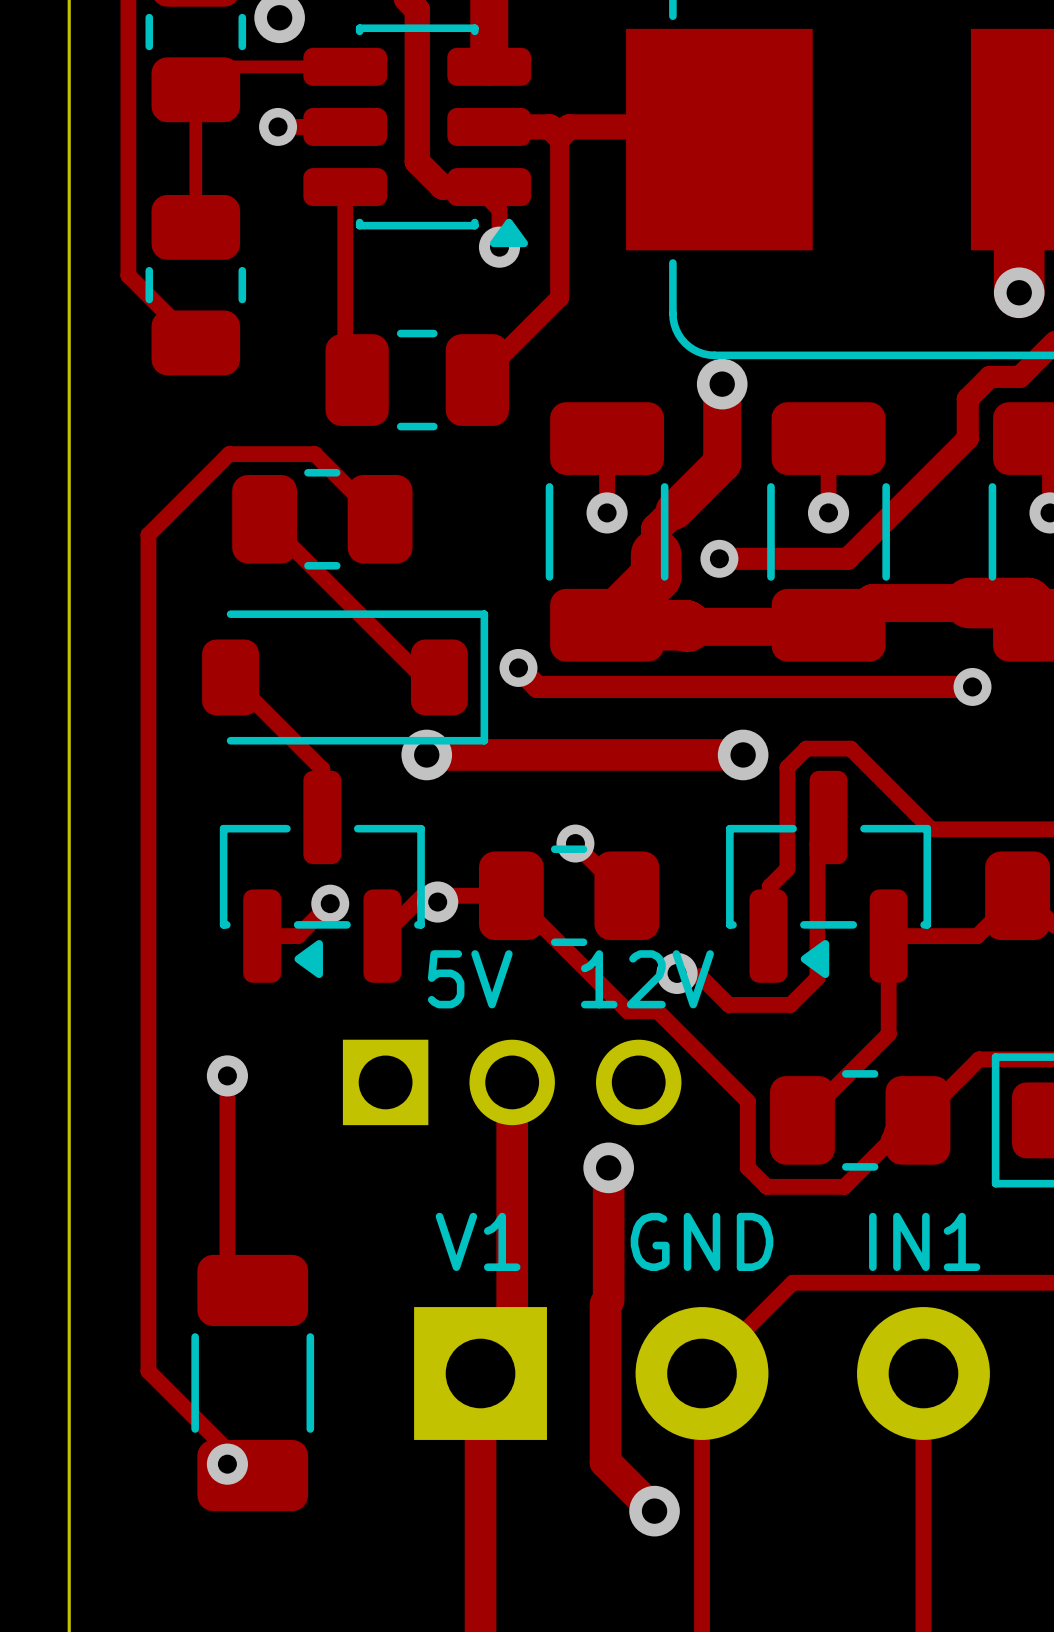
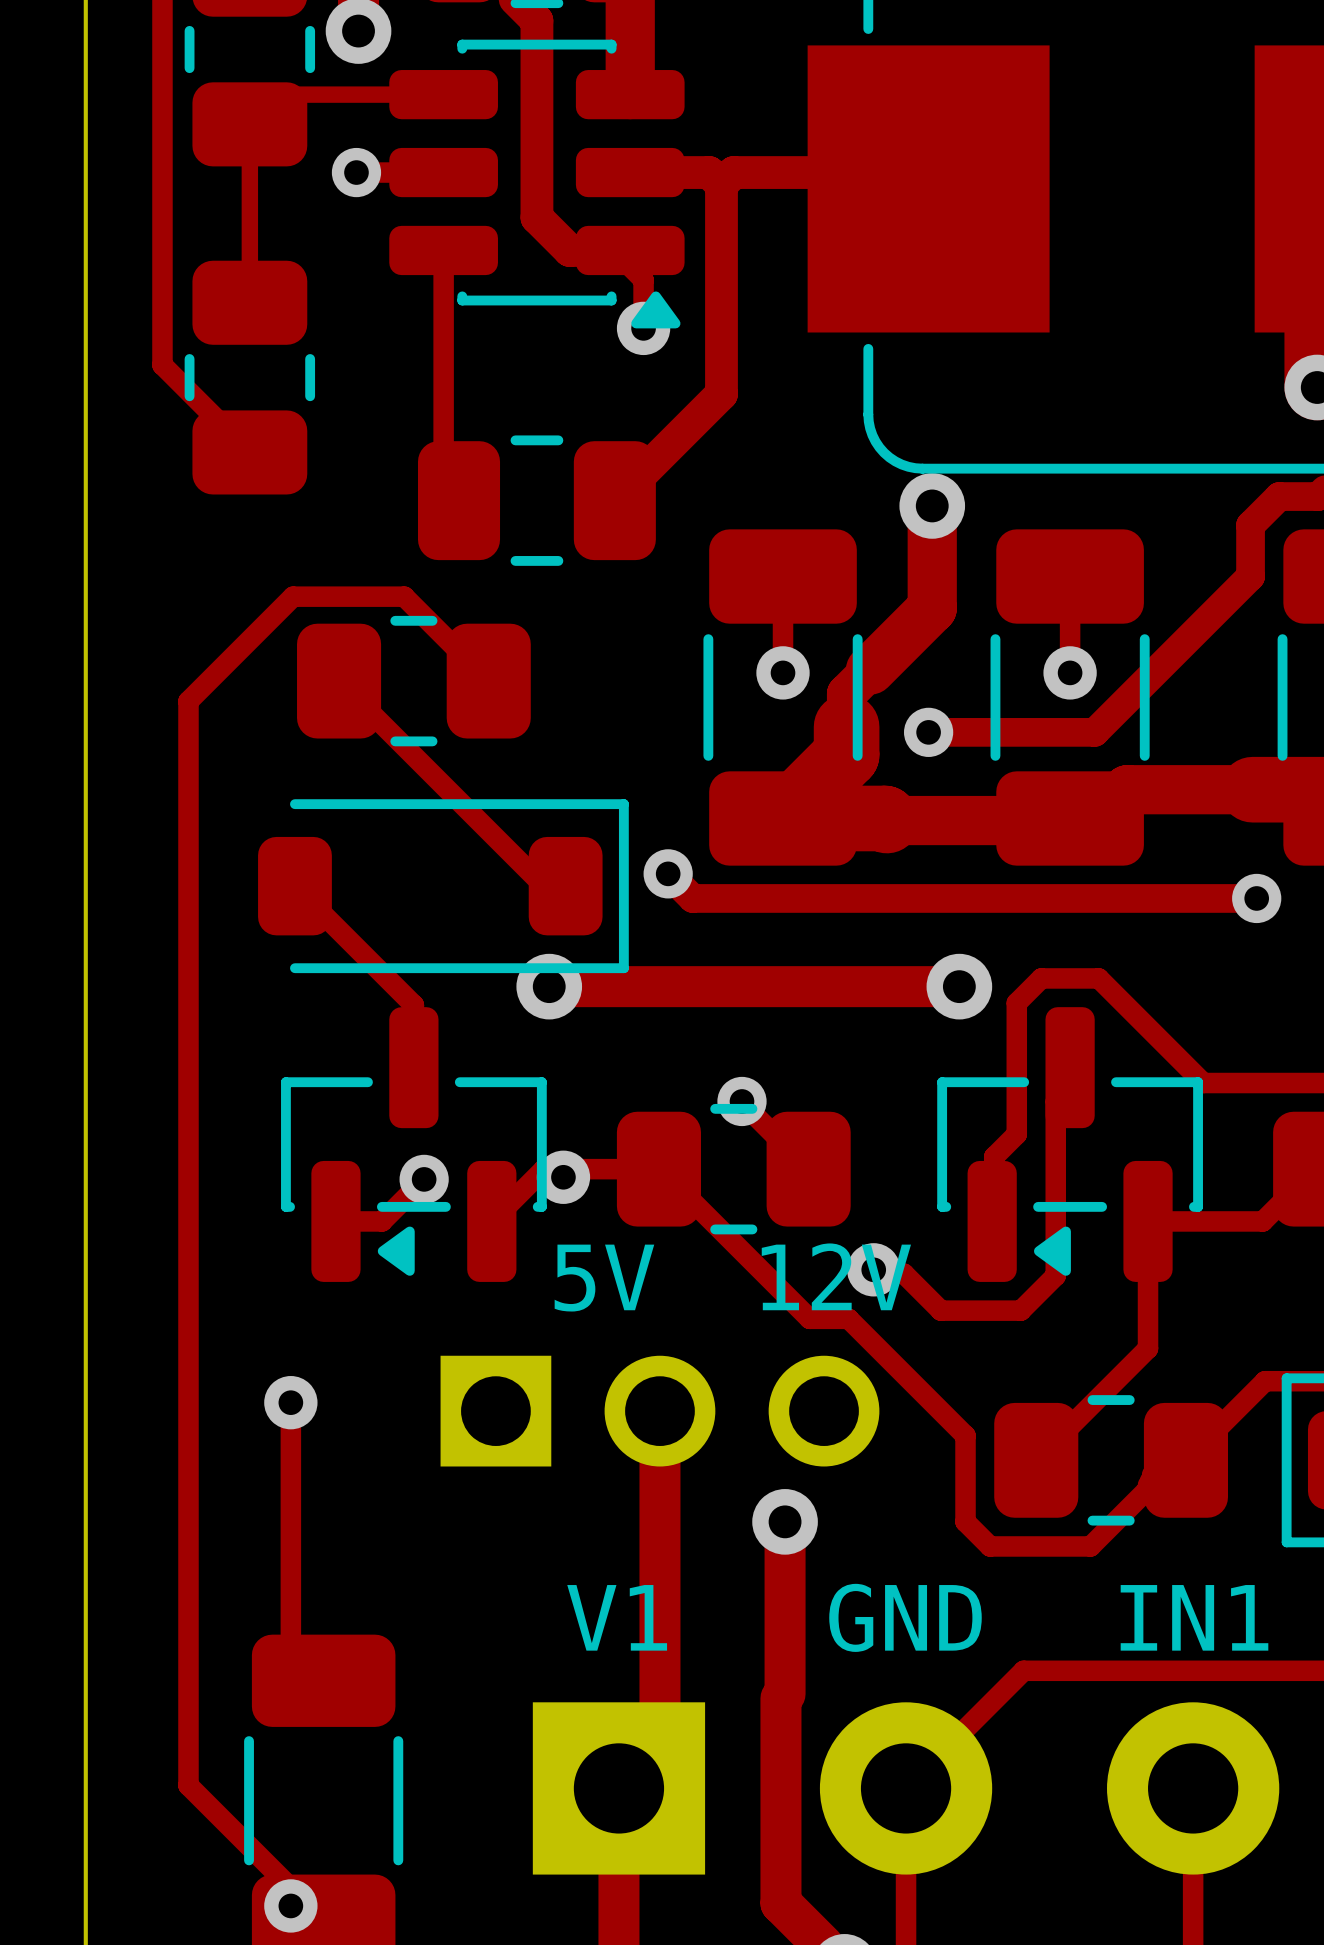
track width: thin (559, 136) (559, 297) (477, 380) -> thick (721, 184) (721, 394) (614, 500)

